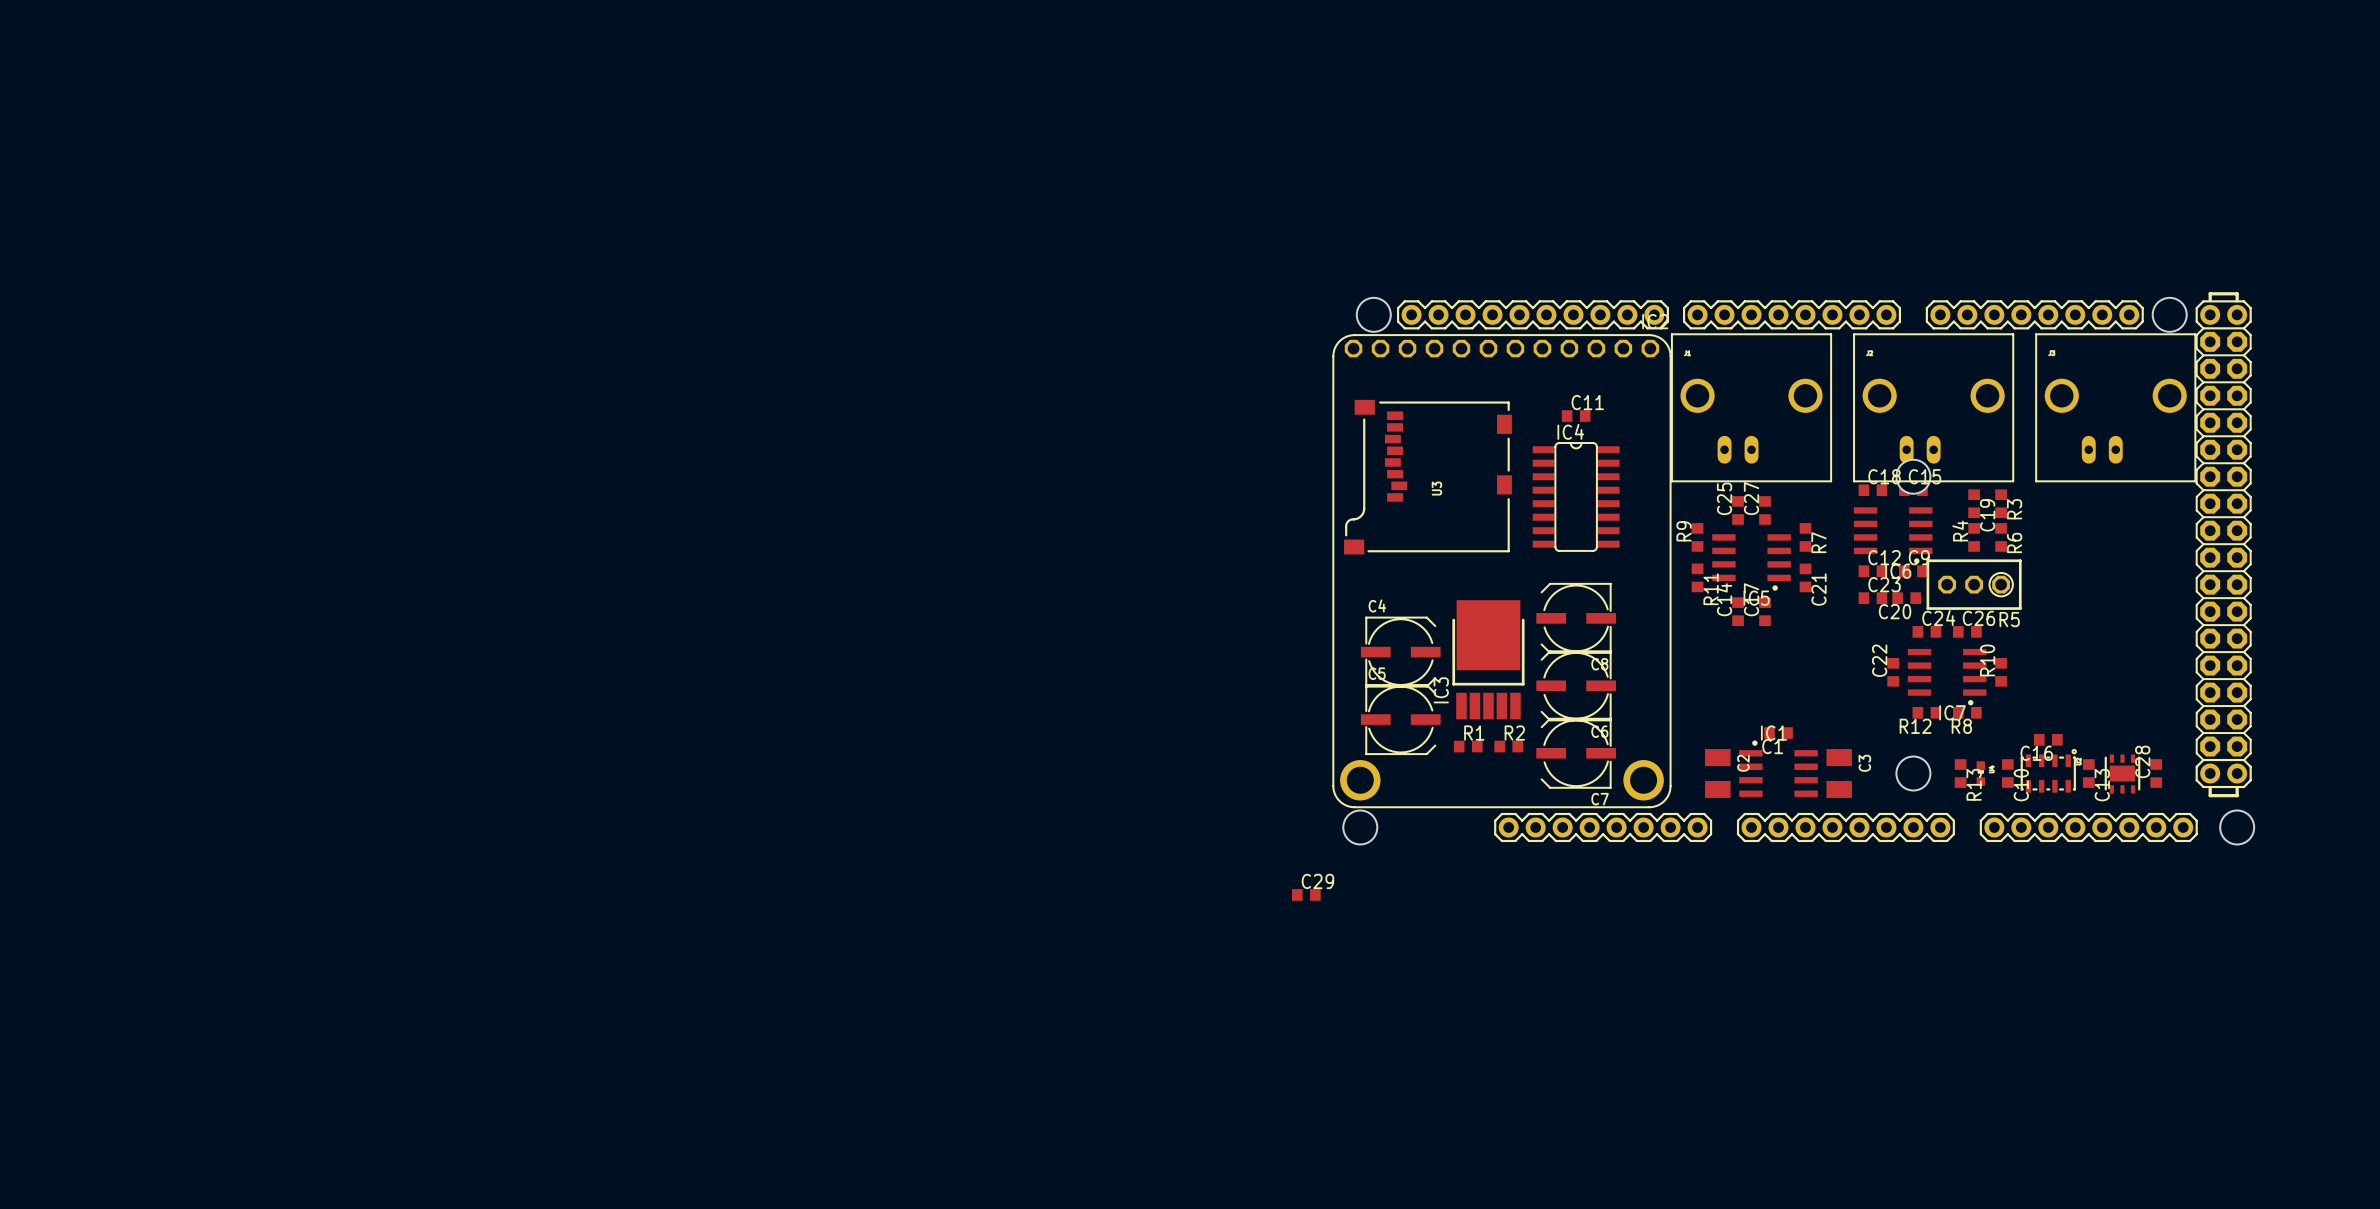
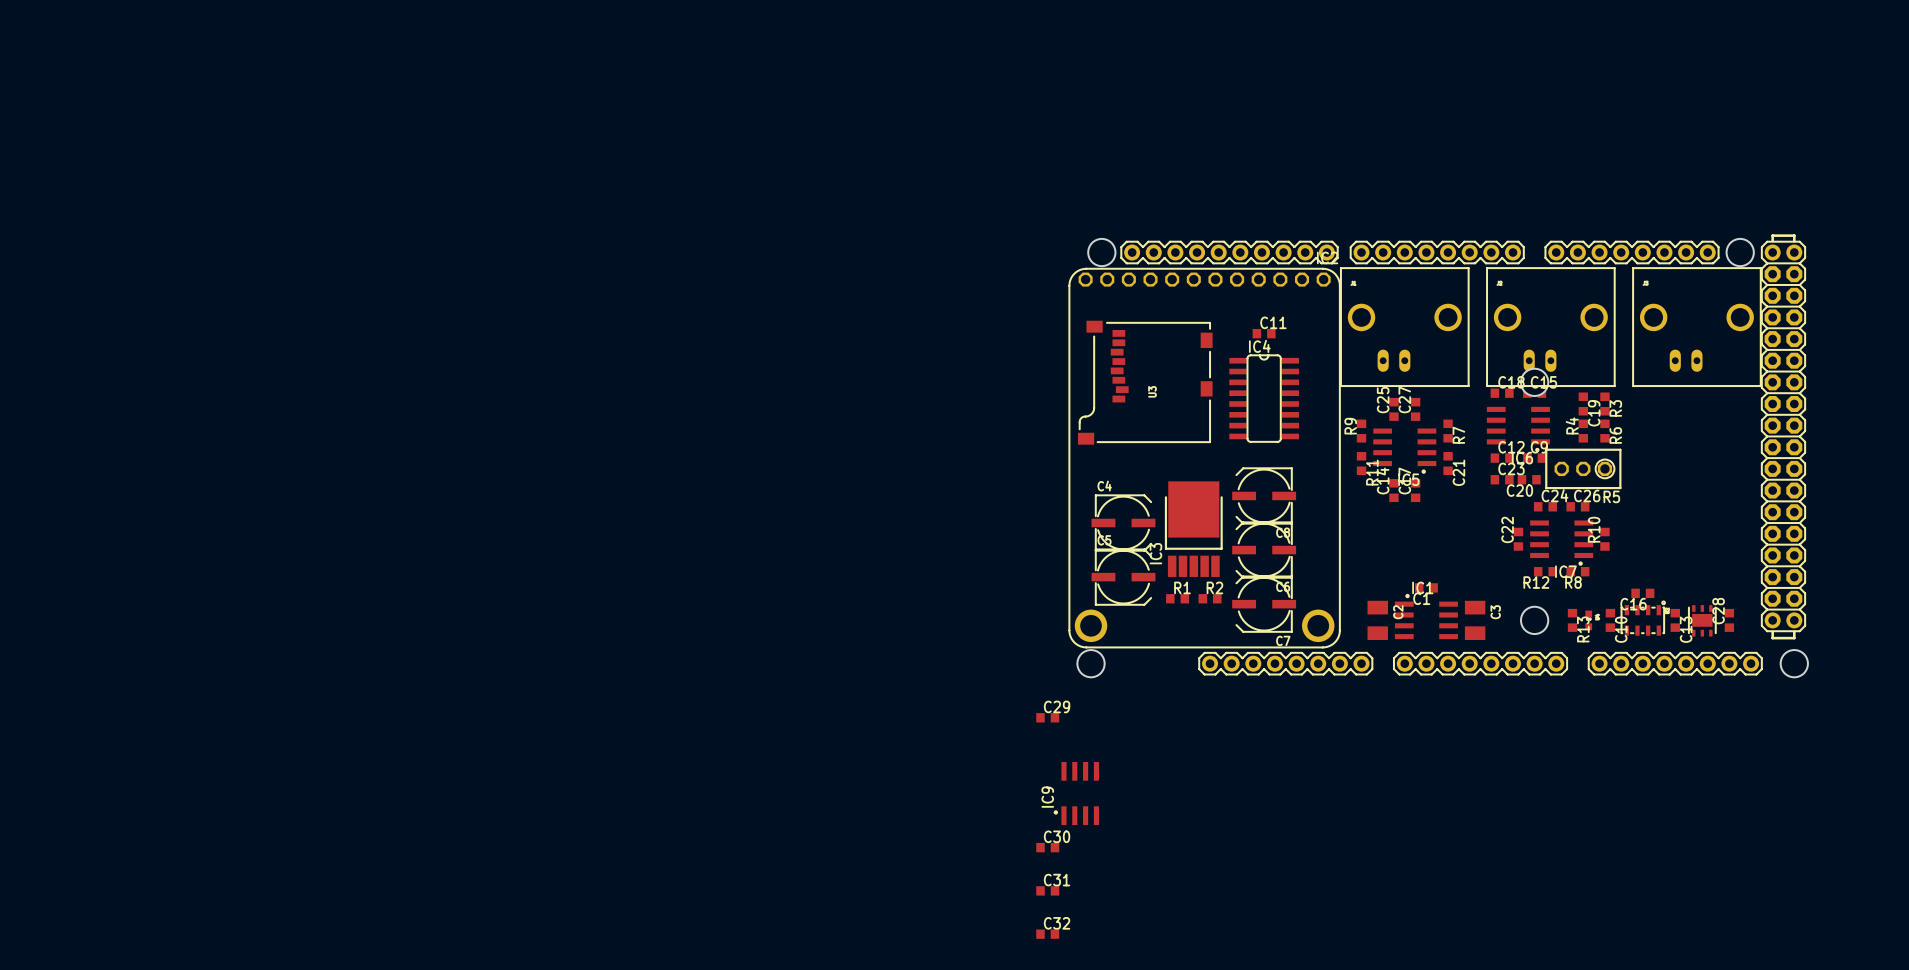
IC9: none -> (1076, 793)
C30: none -> (1047, 847)
C31: none -> (1047, 890)
C32: none -> (1047, 934)

